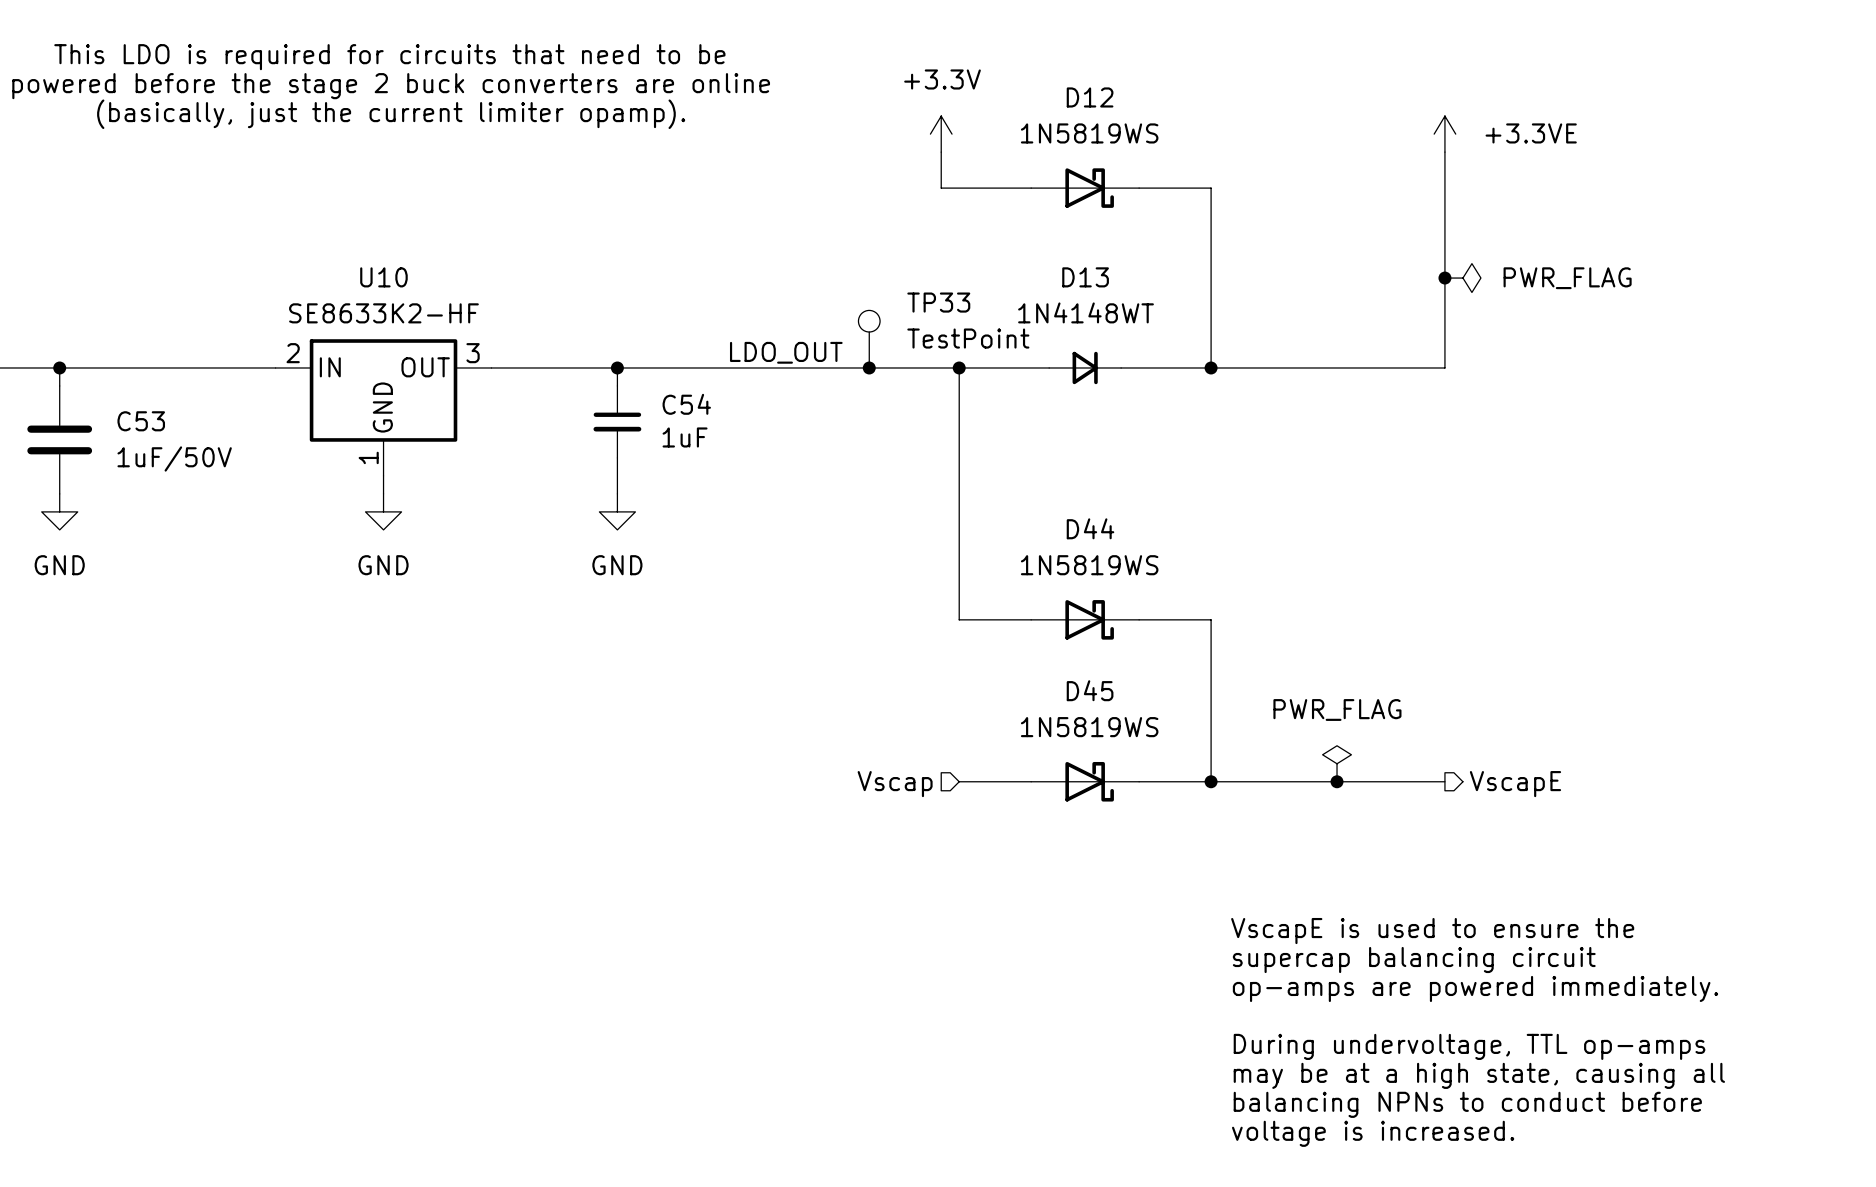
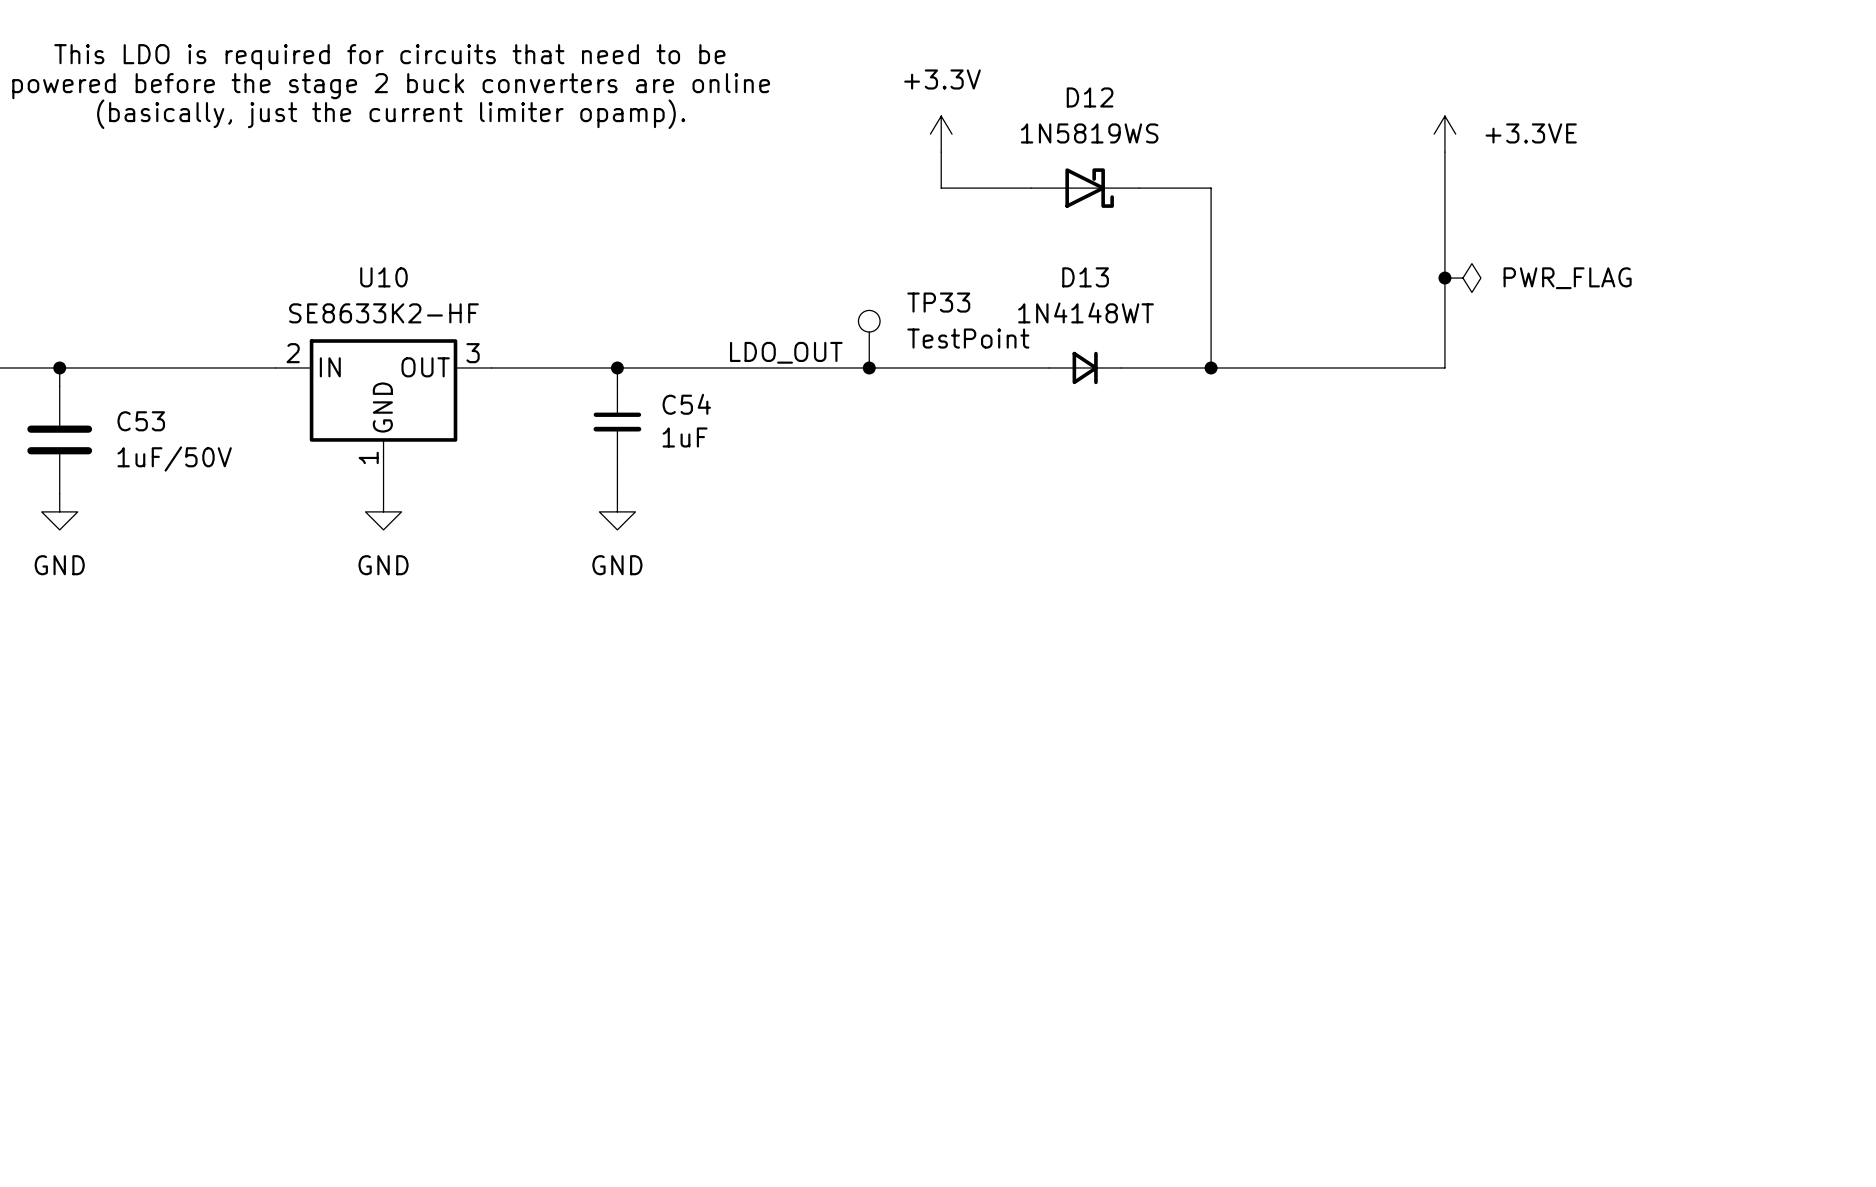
wire: (959, 367) (959, 619) (1031, 619) -> none
junction: (959, 367) -> none
D44: 1N5819WS (1085, 619) -> none
wire: (1139, 619) (1211, 619) (1211, 781) -> none
power symbol: PWR_FLAG (1337, 763) -> none
wire: (959, 781) (1031, 781) -> none
D45: 1N5819WS (1085, 781) -> none
wire: (1139, 781) (1444, 781) -> none
junction: (1211, 781) -> none
junction: (1337, 781) -> none
hierarchical label: Vscap (895, 784) -> none
hierarchical label: VscapE (1515, 784) -> none
text: VscapE is used to ensure the (1432, 931) -> none
text: supercap balancing circuit (1414, 960) -> none
text: op-amps are powered immediately. (1475, 988) -> none
text: During undervoltage, TTL op-amps (1469, 1046) -> none
text: may be at a high state, causing all (1479, 1075) -> none
text: balancing NPNs to conduct before (1467, 1104) -> none
text: voltage is increased. (1373, 1133) -> none

